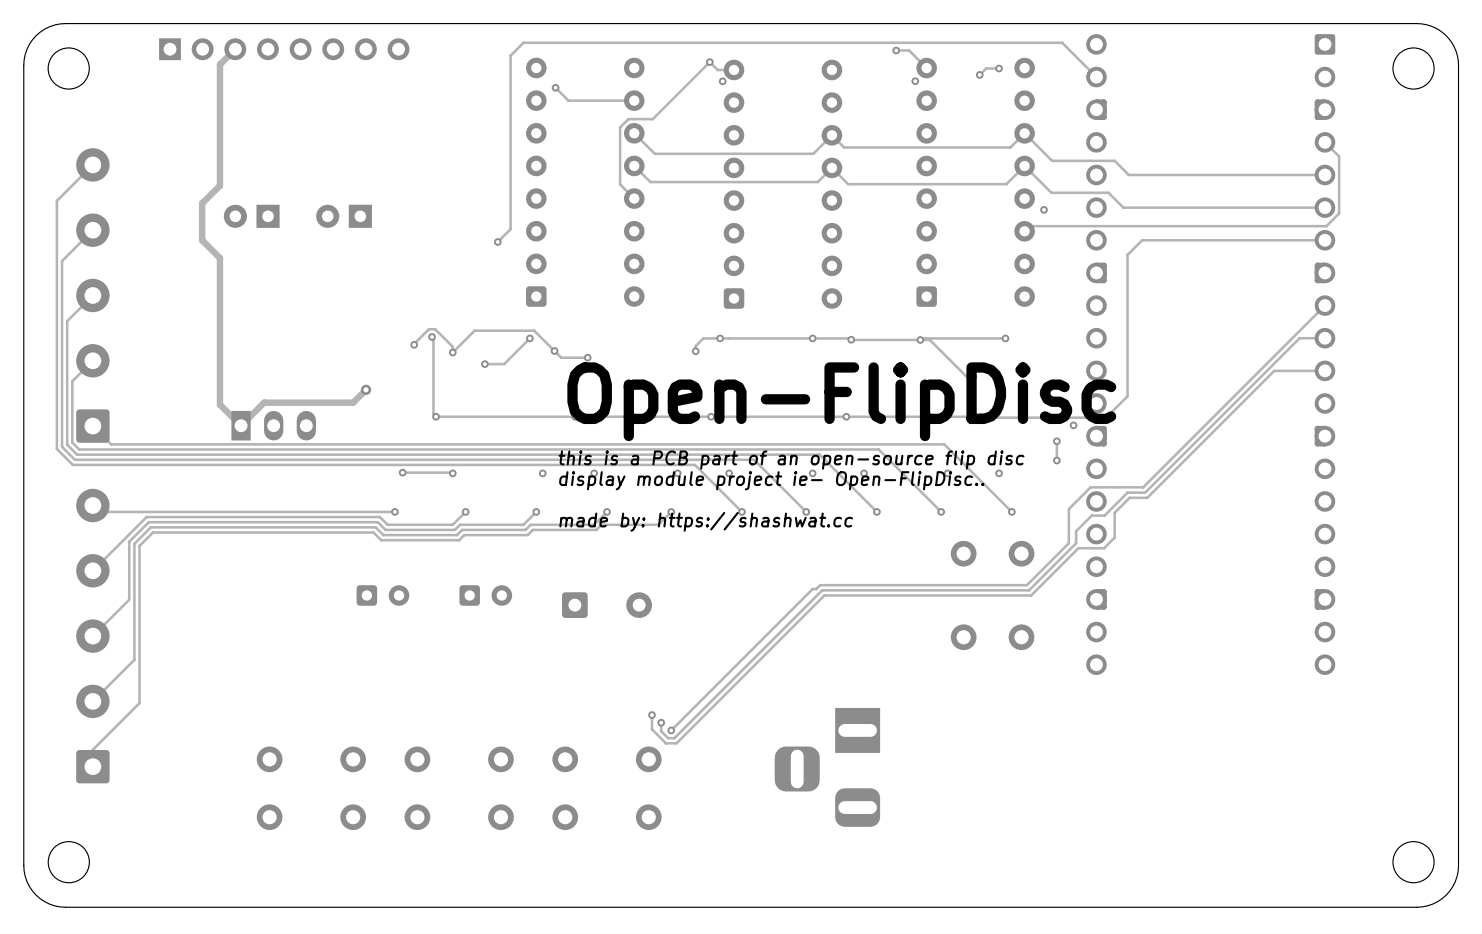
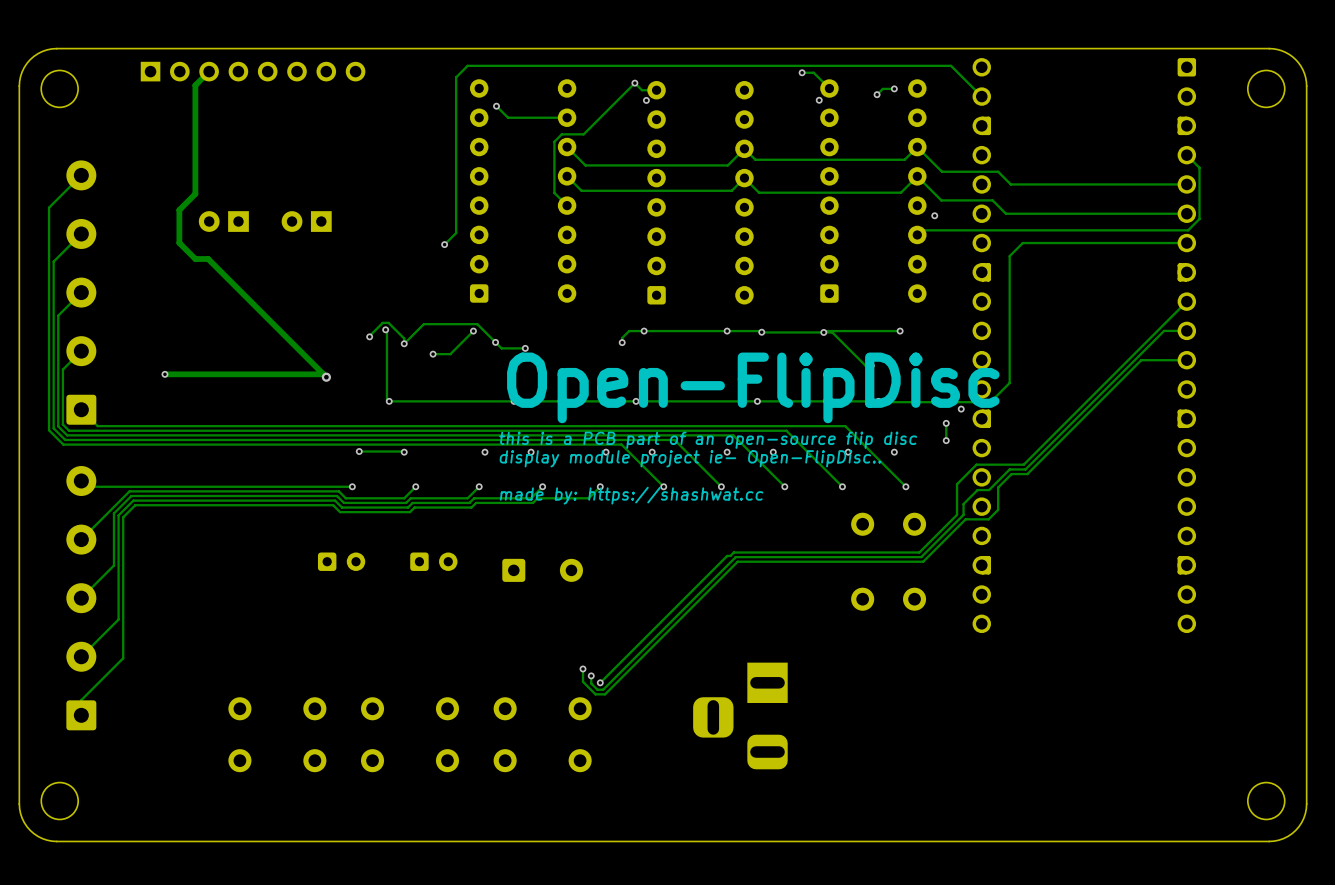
track: (219, 258) (219, 404) (241, 425) (264, 402) (353, 402) (366, 389) -> (195, 259) (208, 259) (326, 377)
via: none -> (164, 374)
track: none -> (323, 374) (164, 374)
part: (273, 425) -> none

